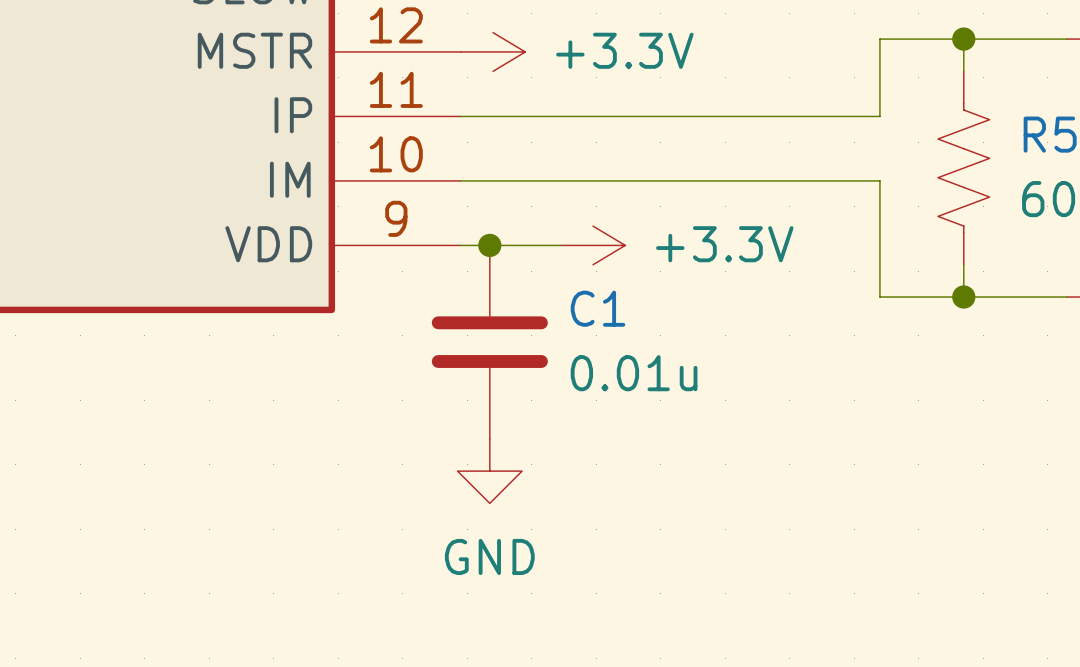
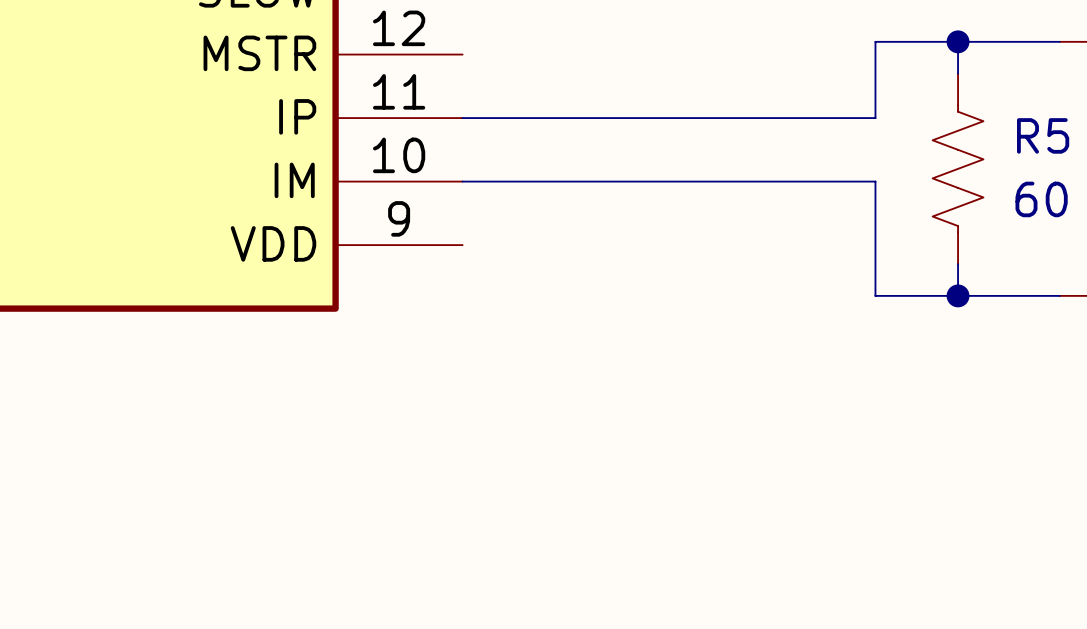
power symbol: +3.3V (493, 51) -> none
wire: (460, 245) (560, 245) -> none
junction: (489, 245) -> none
power symbol: +3.3V (592, 245) -> none
C1: 0.01u (489, 342) -> none
power symbol: GND (489, 471) -> none

